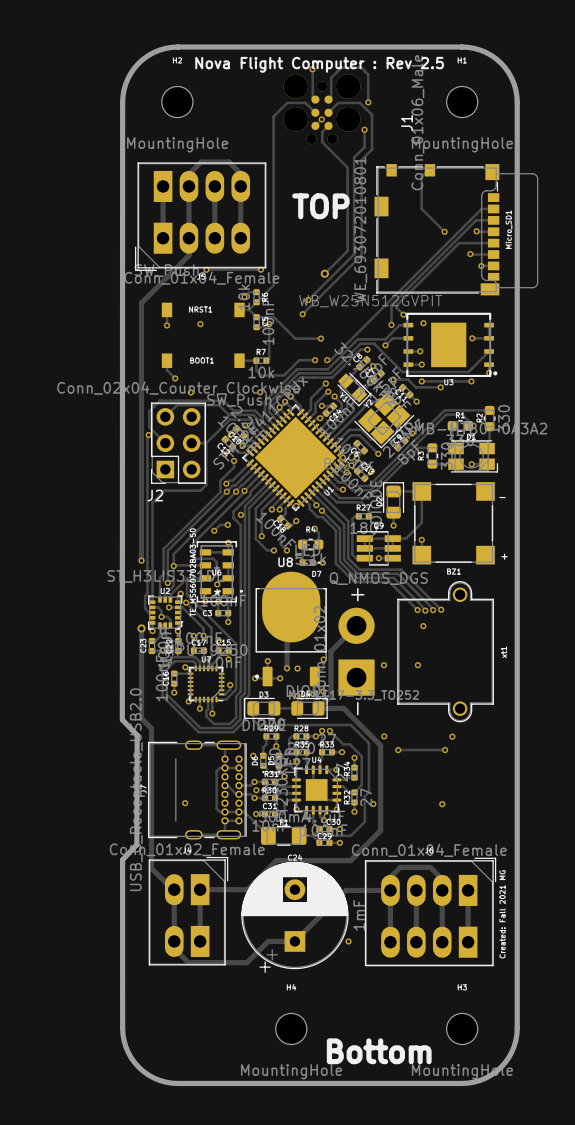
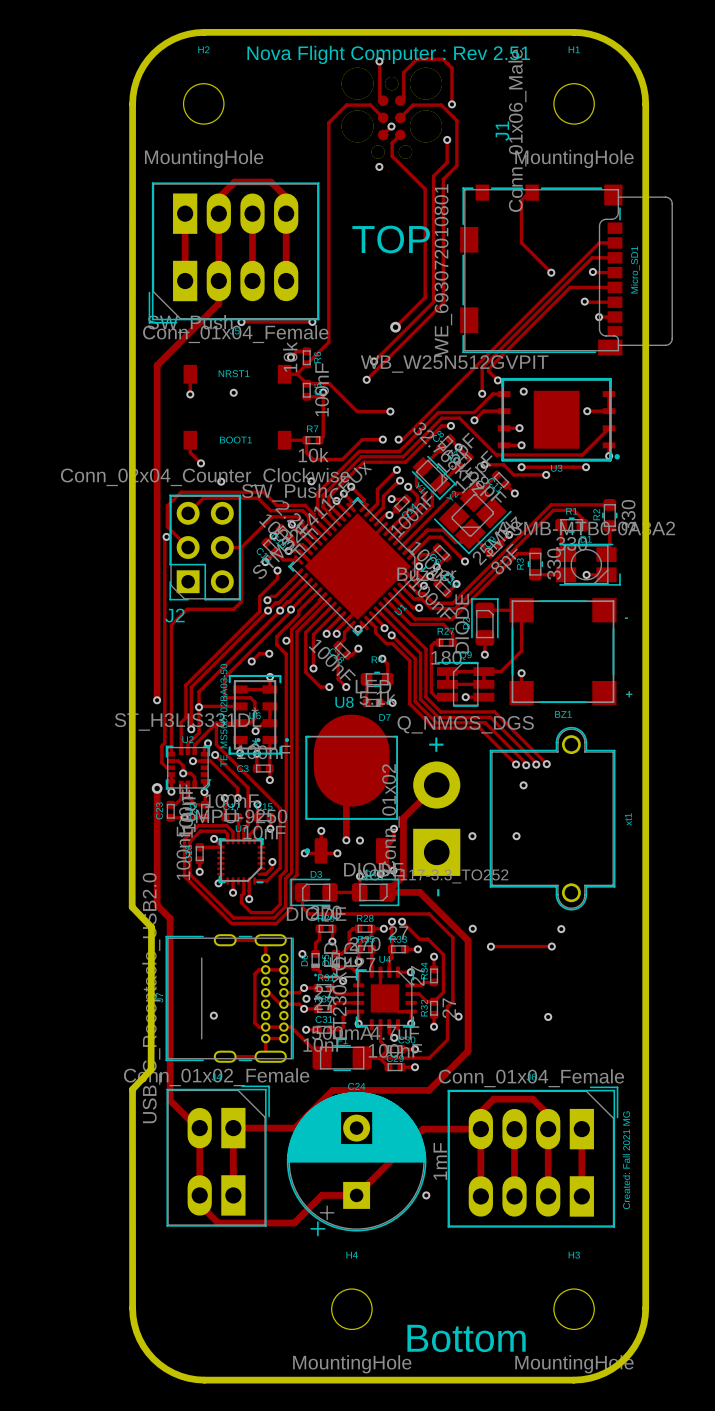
text: Nova Flight Computer : Rev 2.5 (319, 64) -> Nova Flight Computer : Rev 2.51 (388, 54)
via: none -> (379, 166)

